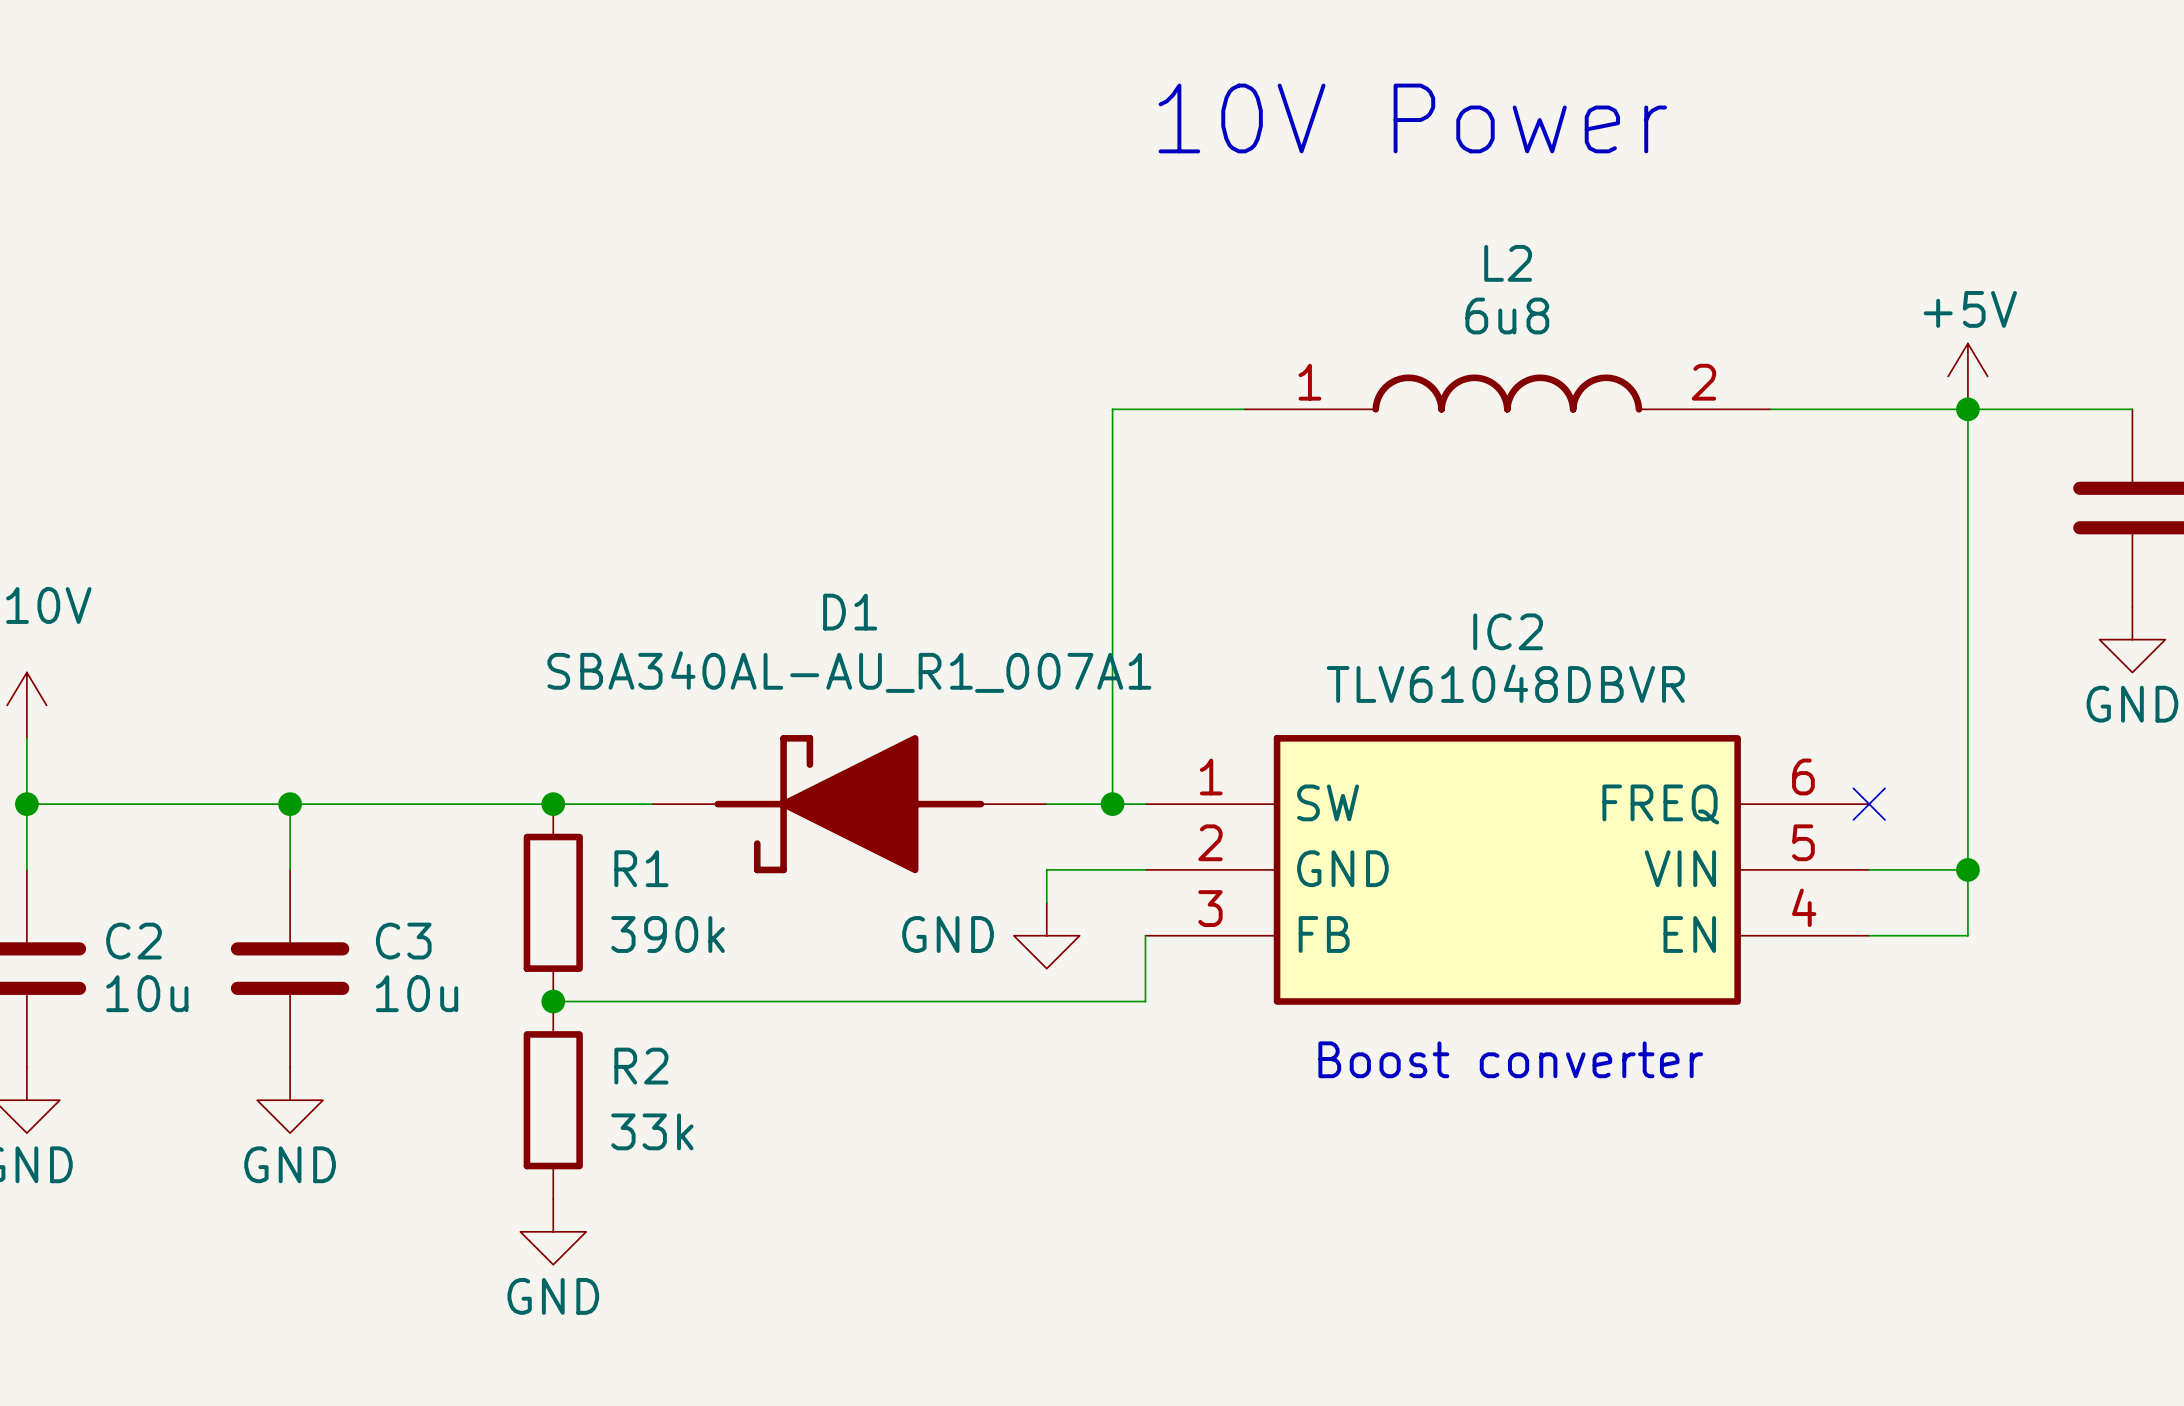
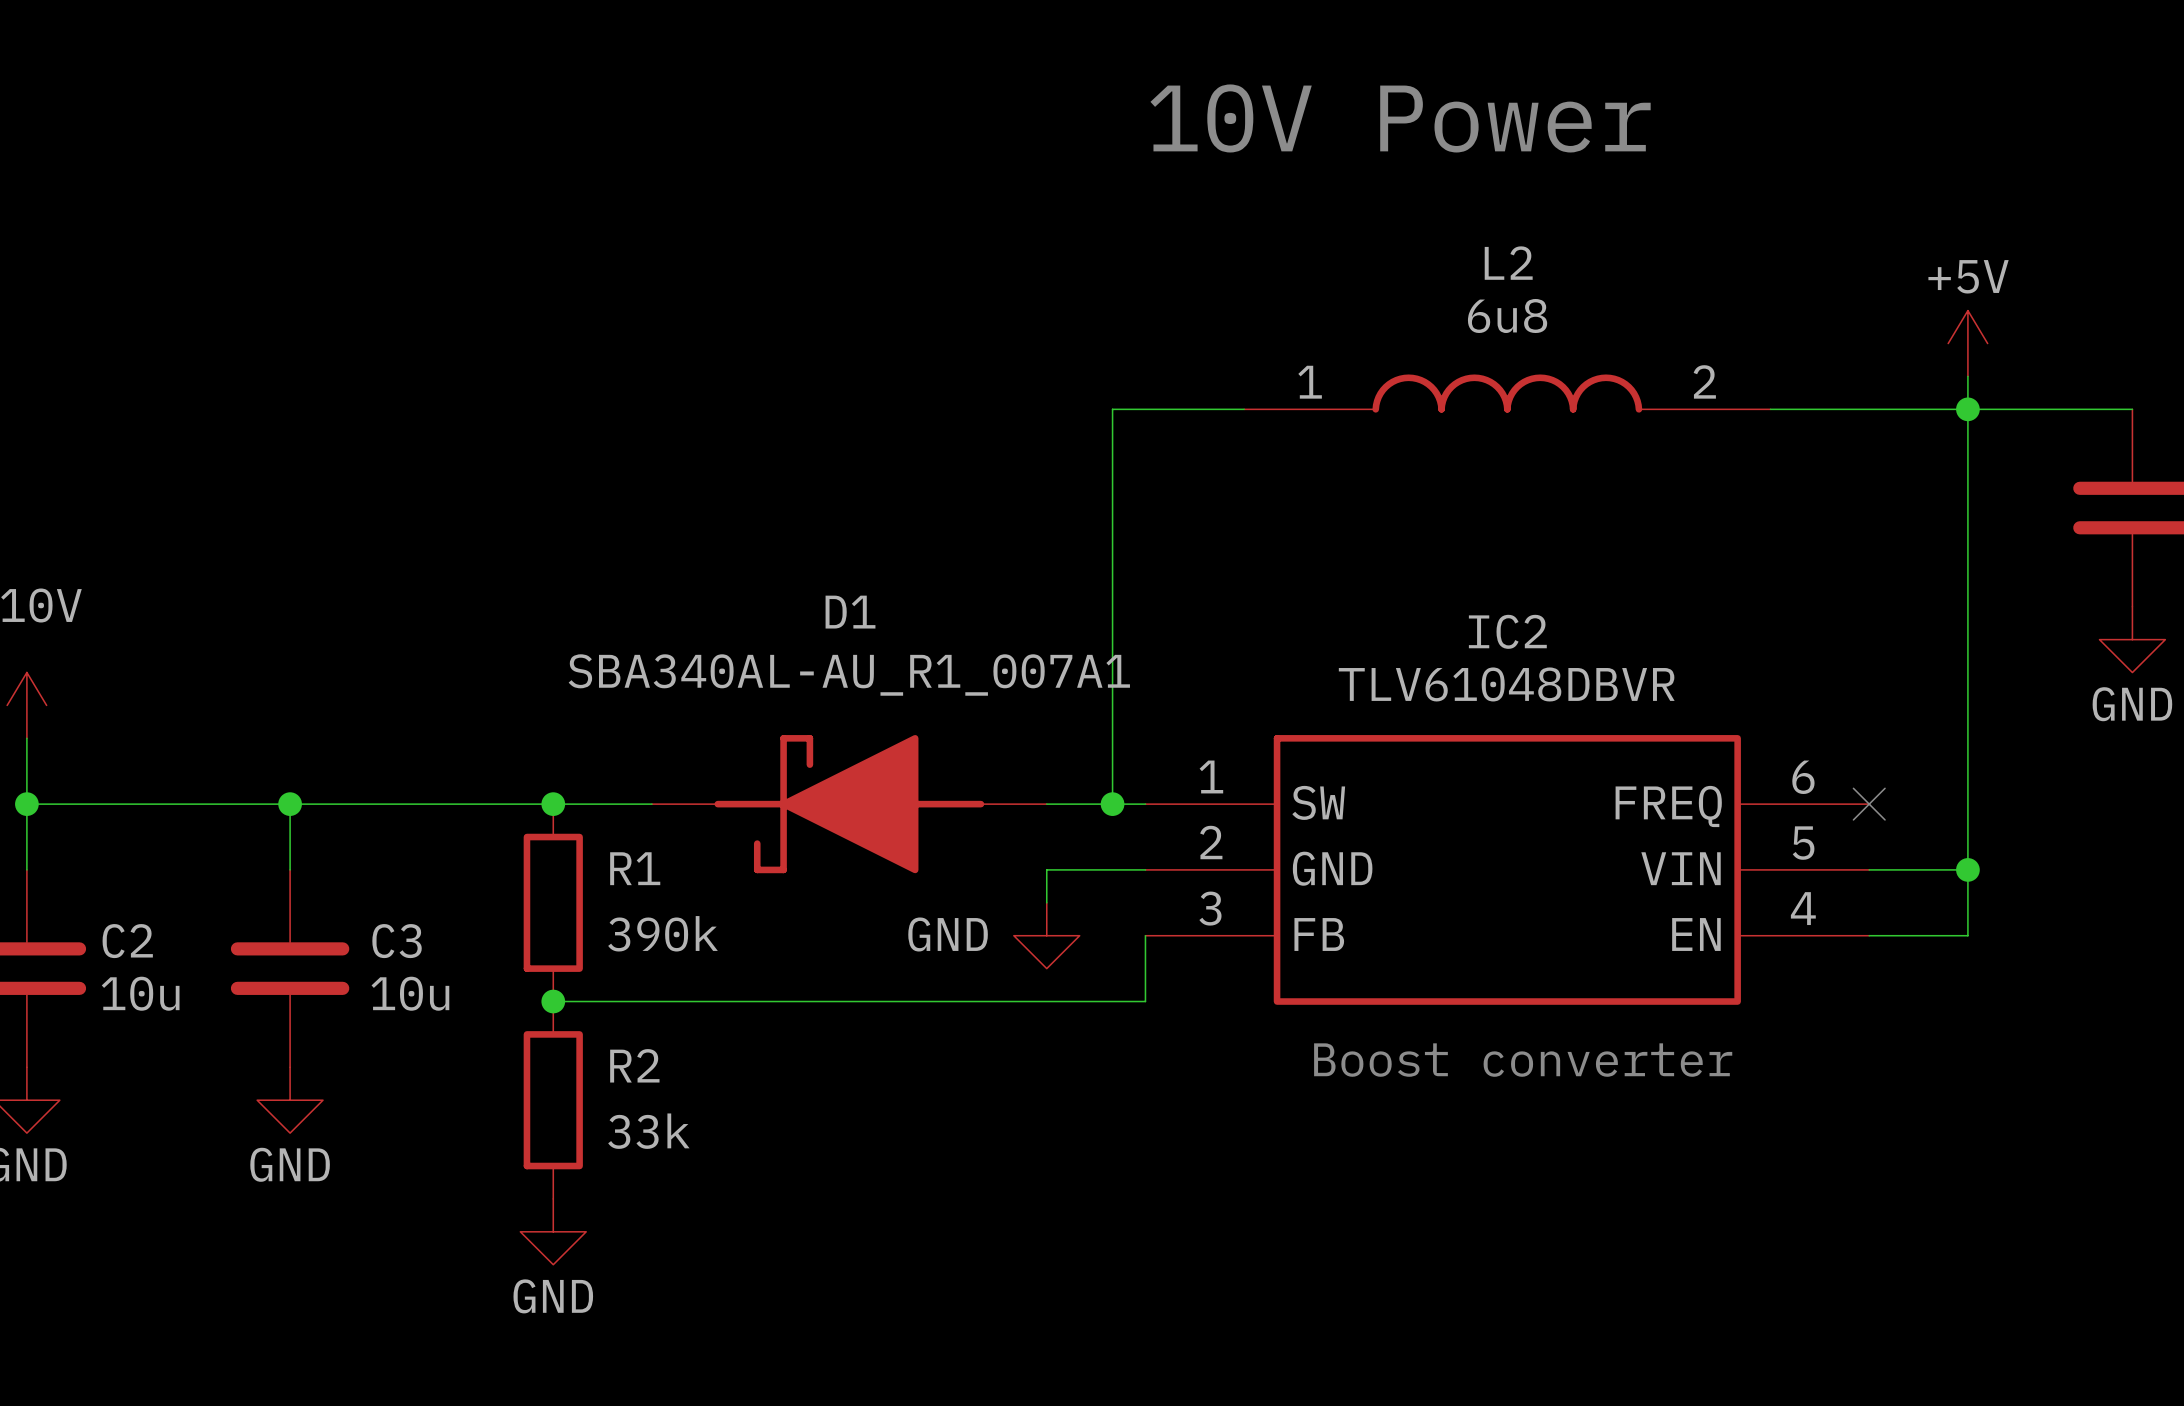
power symbol position: +5V (1967, 376) -> +5V (1967, 343)

